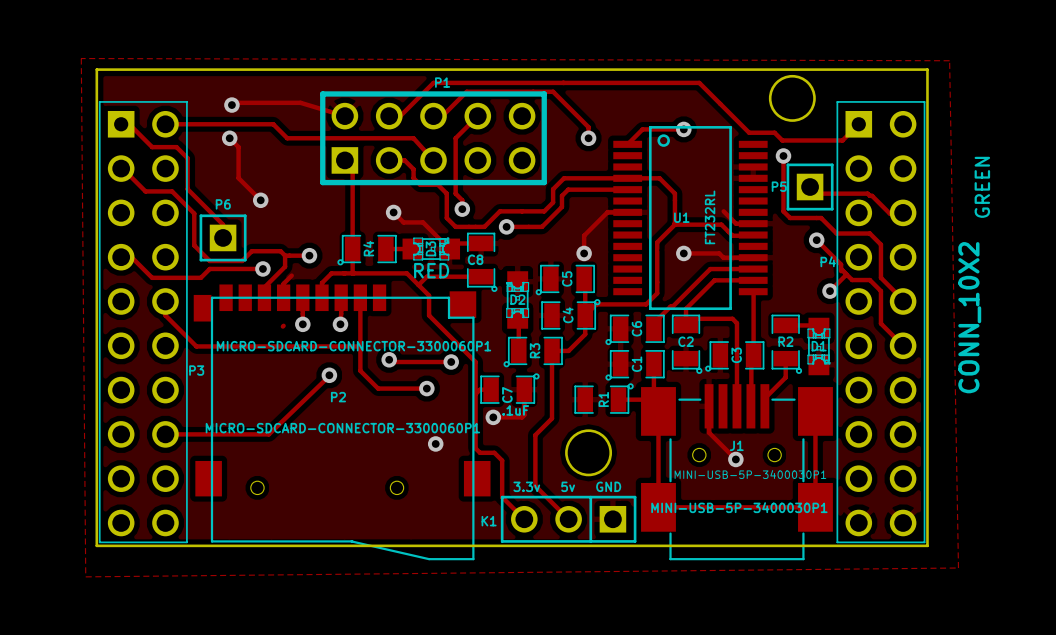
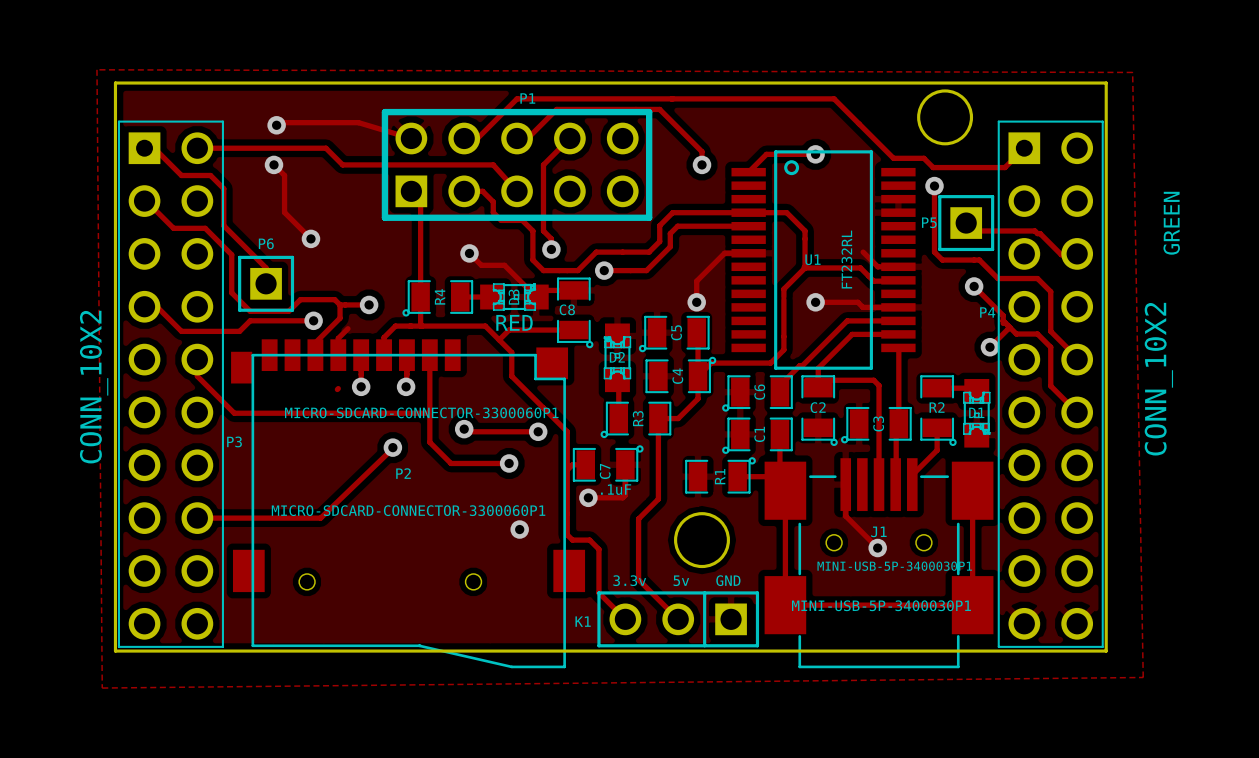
P3 value: none -> CONN_10X2 (94, 387)

